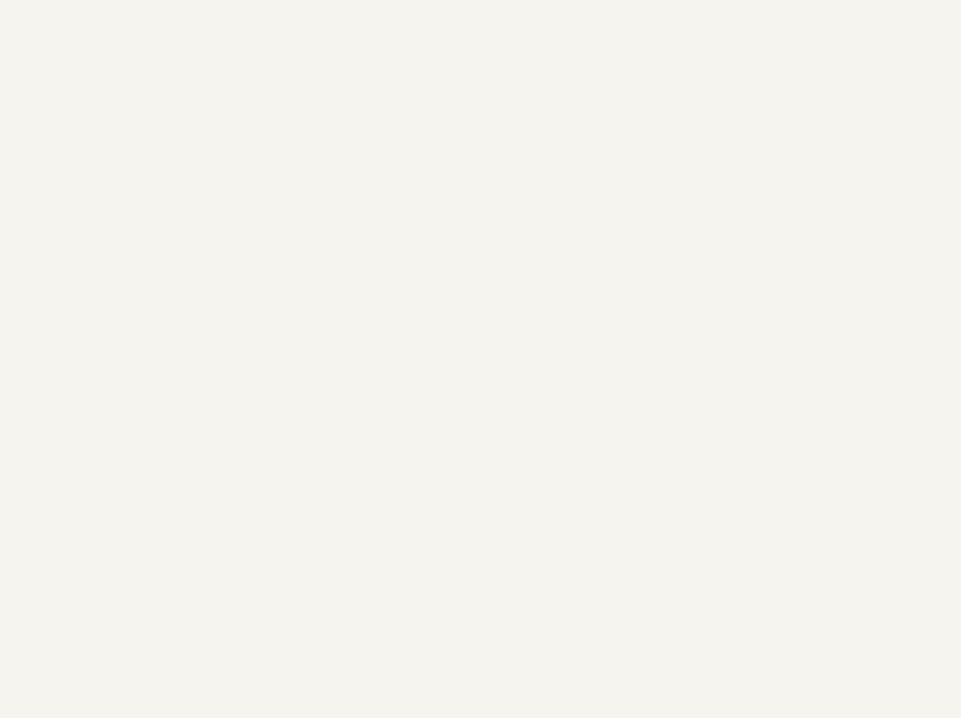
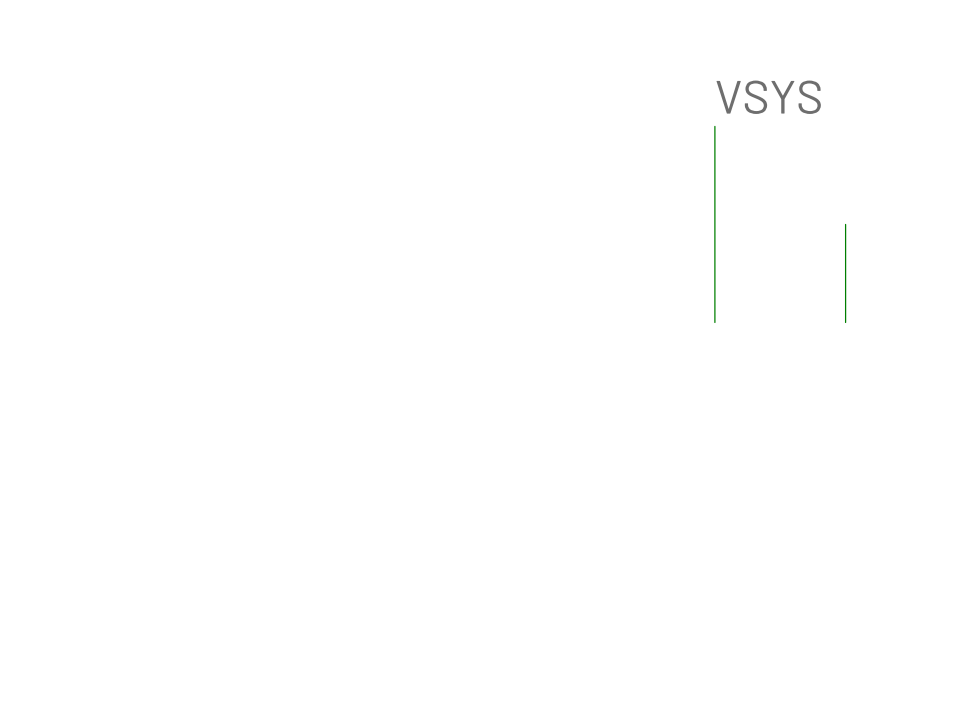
label: none -> VSYS (768, 97)
wire: none -> (714, 126) (714, 322)
wire: none -> (845, 224) (845, 322)

